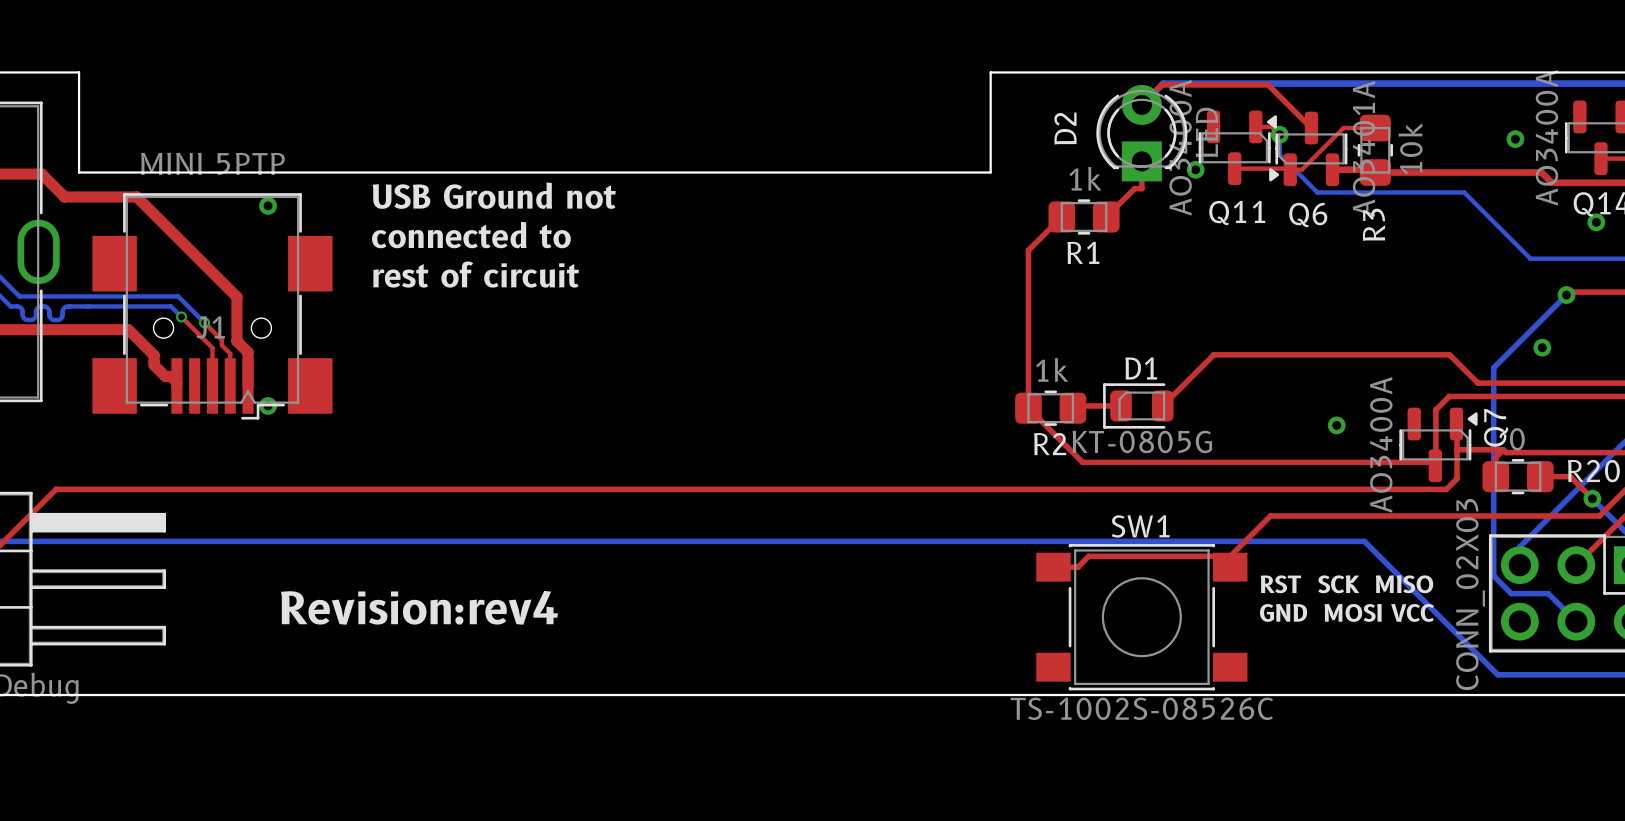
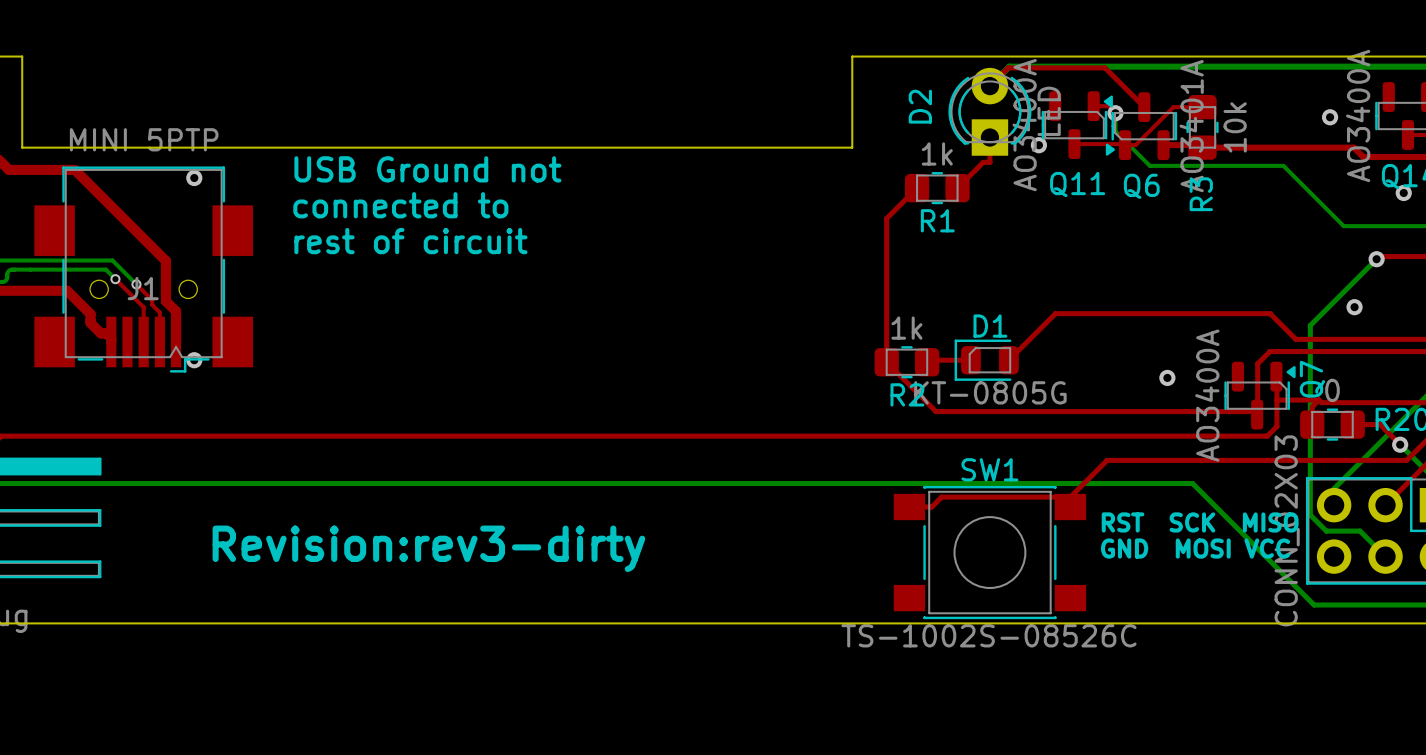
text: Revision:rev4 (419, 607) -> Revision:rev3-dirty (428, 548)

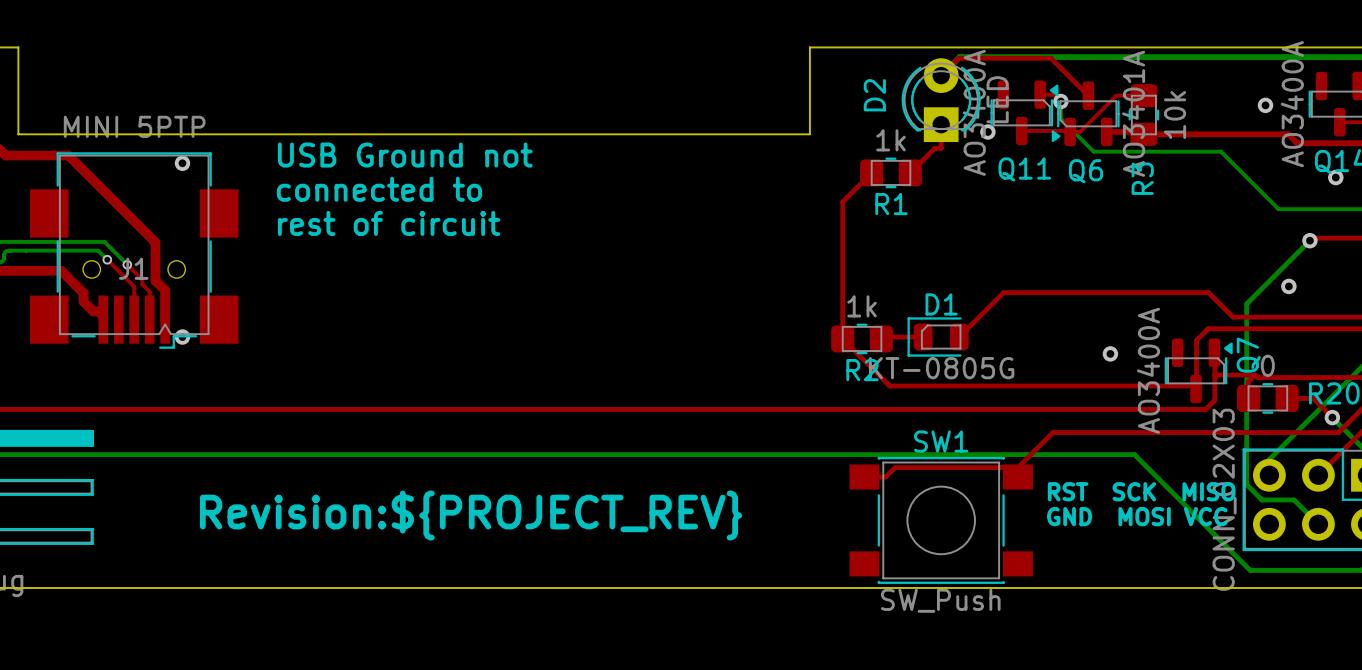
text: Revision:rev3-dirty (428, 548) -> Revision:${PROJECT_REV} (471, 515)
SW1 value: TS-1002S-08526C (988, 635) -> SW_Push (940, 600)

